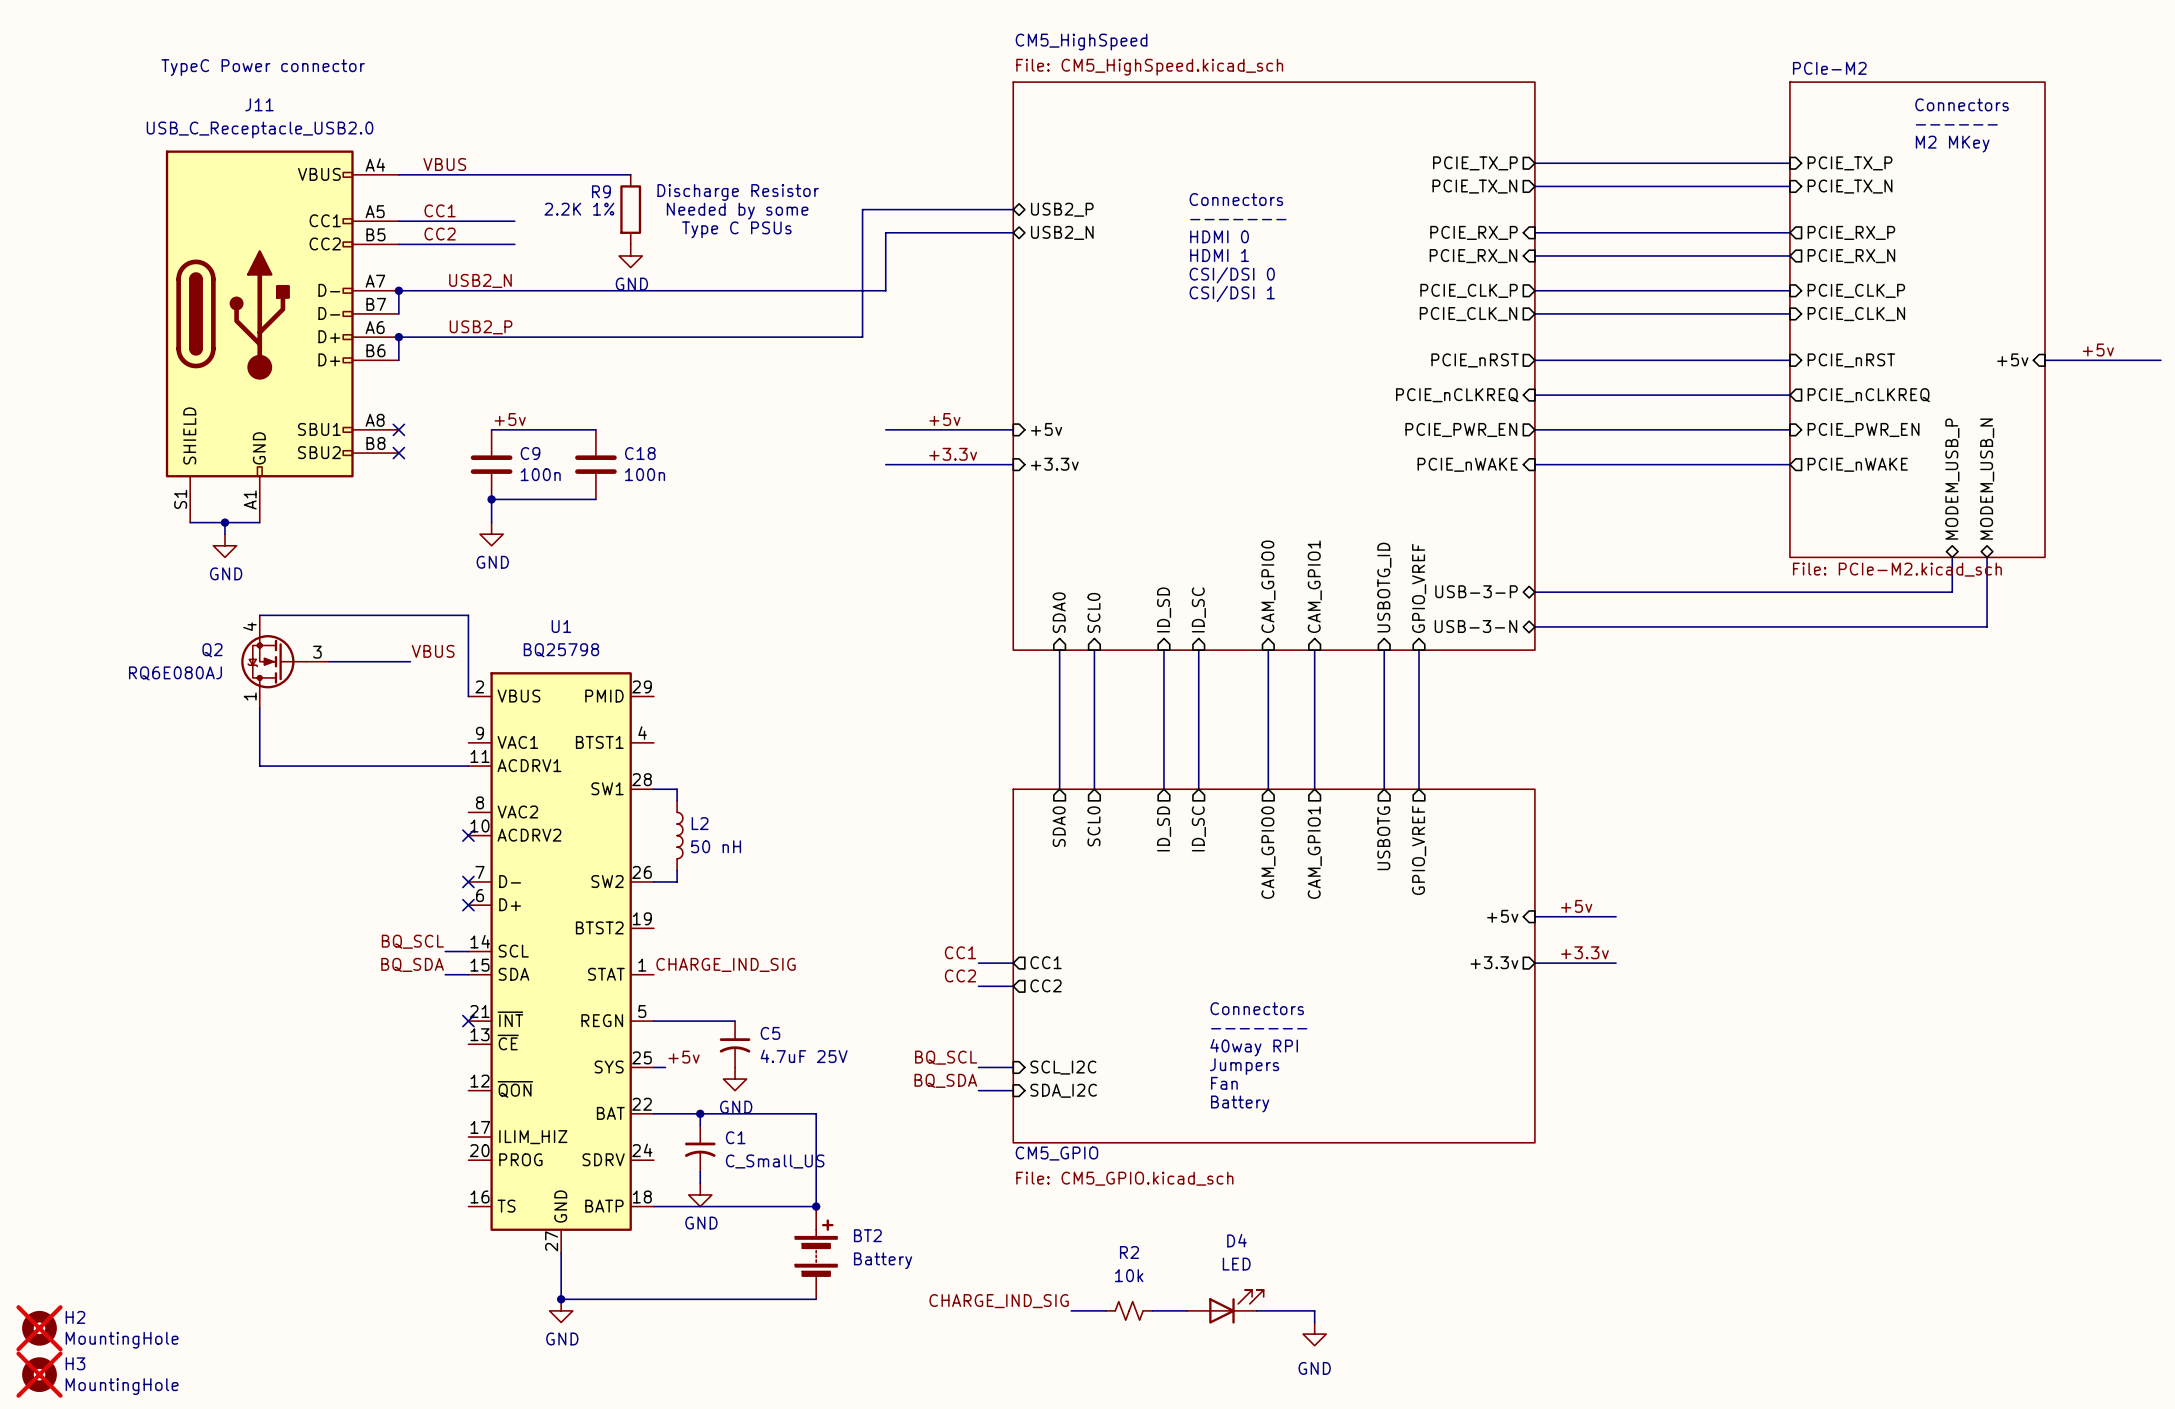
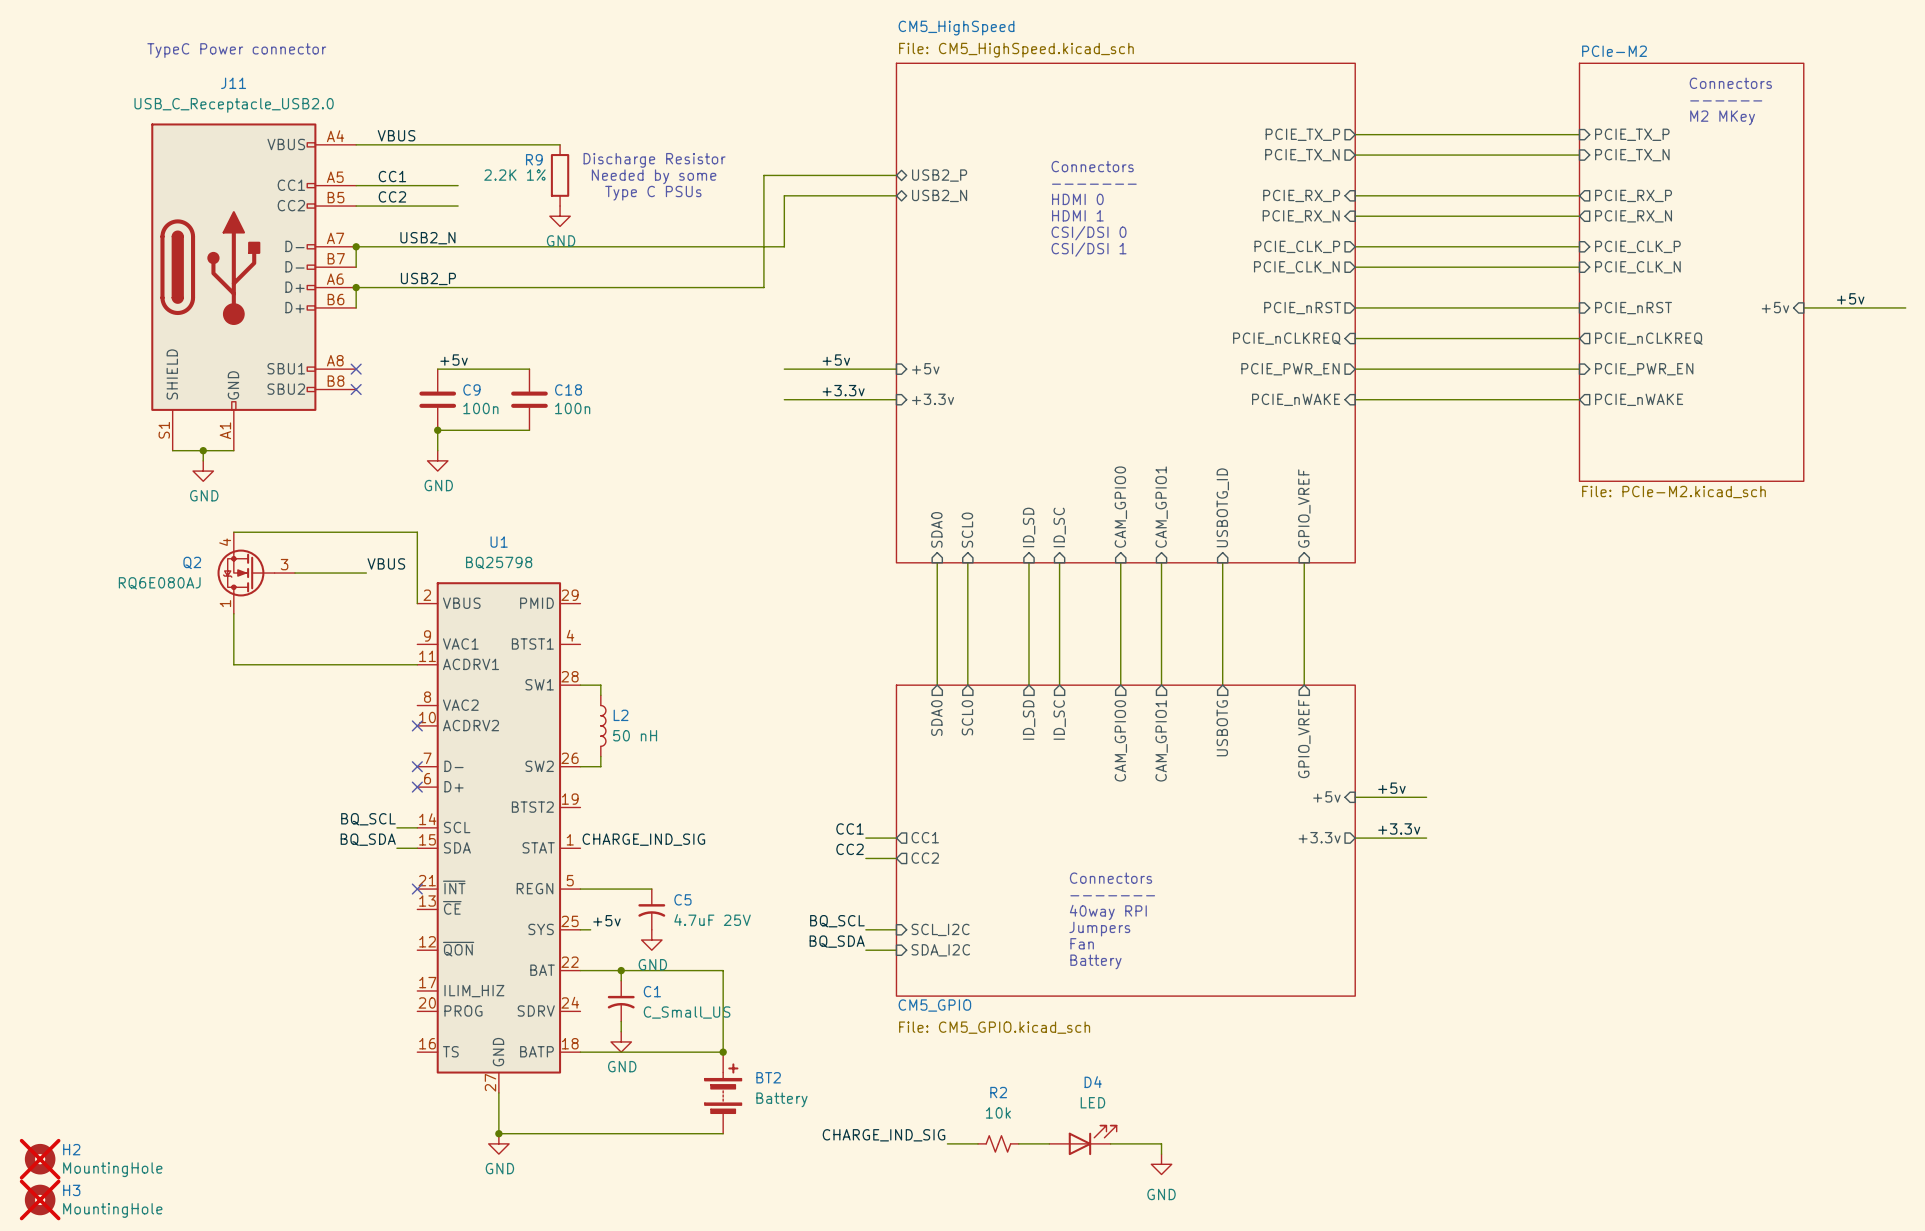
sheet pin: MODEM_USB_P (1952, 479) -> none
sheet pin: MODEM_USB_N (1987, 479) -> none
wire: (1952, 557) (1952, 592) (1534, 592) -> none
wire: (1987, 557) (1987, 626) (1534, 626) -> none
sheet pin position: GPIO_VREF (1419, 588) -> GPIO_VREF (1304, 508)
sheet pin: USB-3-P (1476, 591) -> none
sheet pin: USB-3-N (1475, 626) -> none
wire: (1419, 650) (1419, 789) -> (1304, 562) (1304, 685)
sheet pin position: GPIO_VREF (1419, 850) -> GPIO_VREF (1304, 738)

